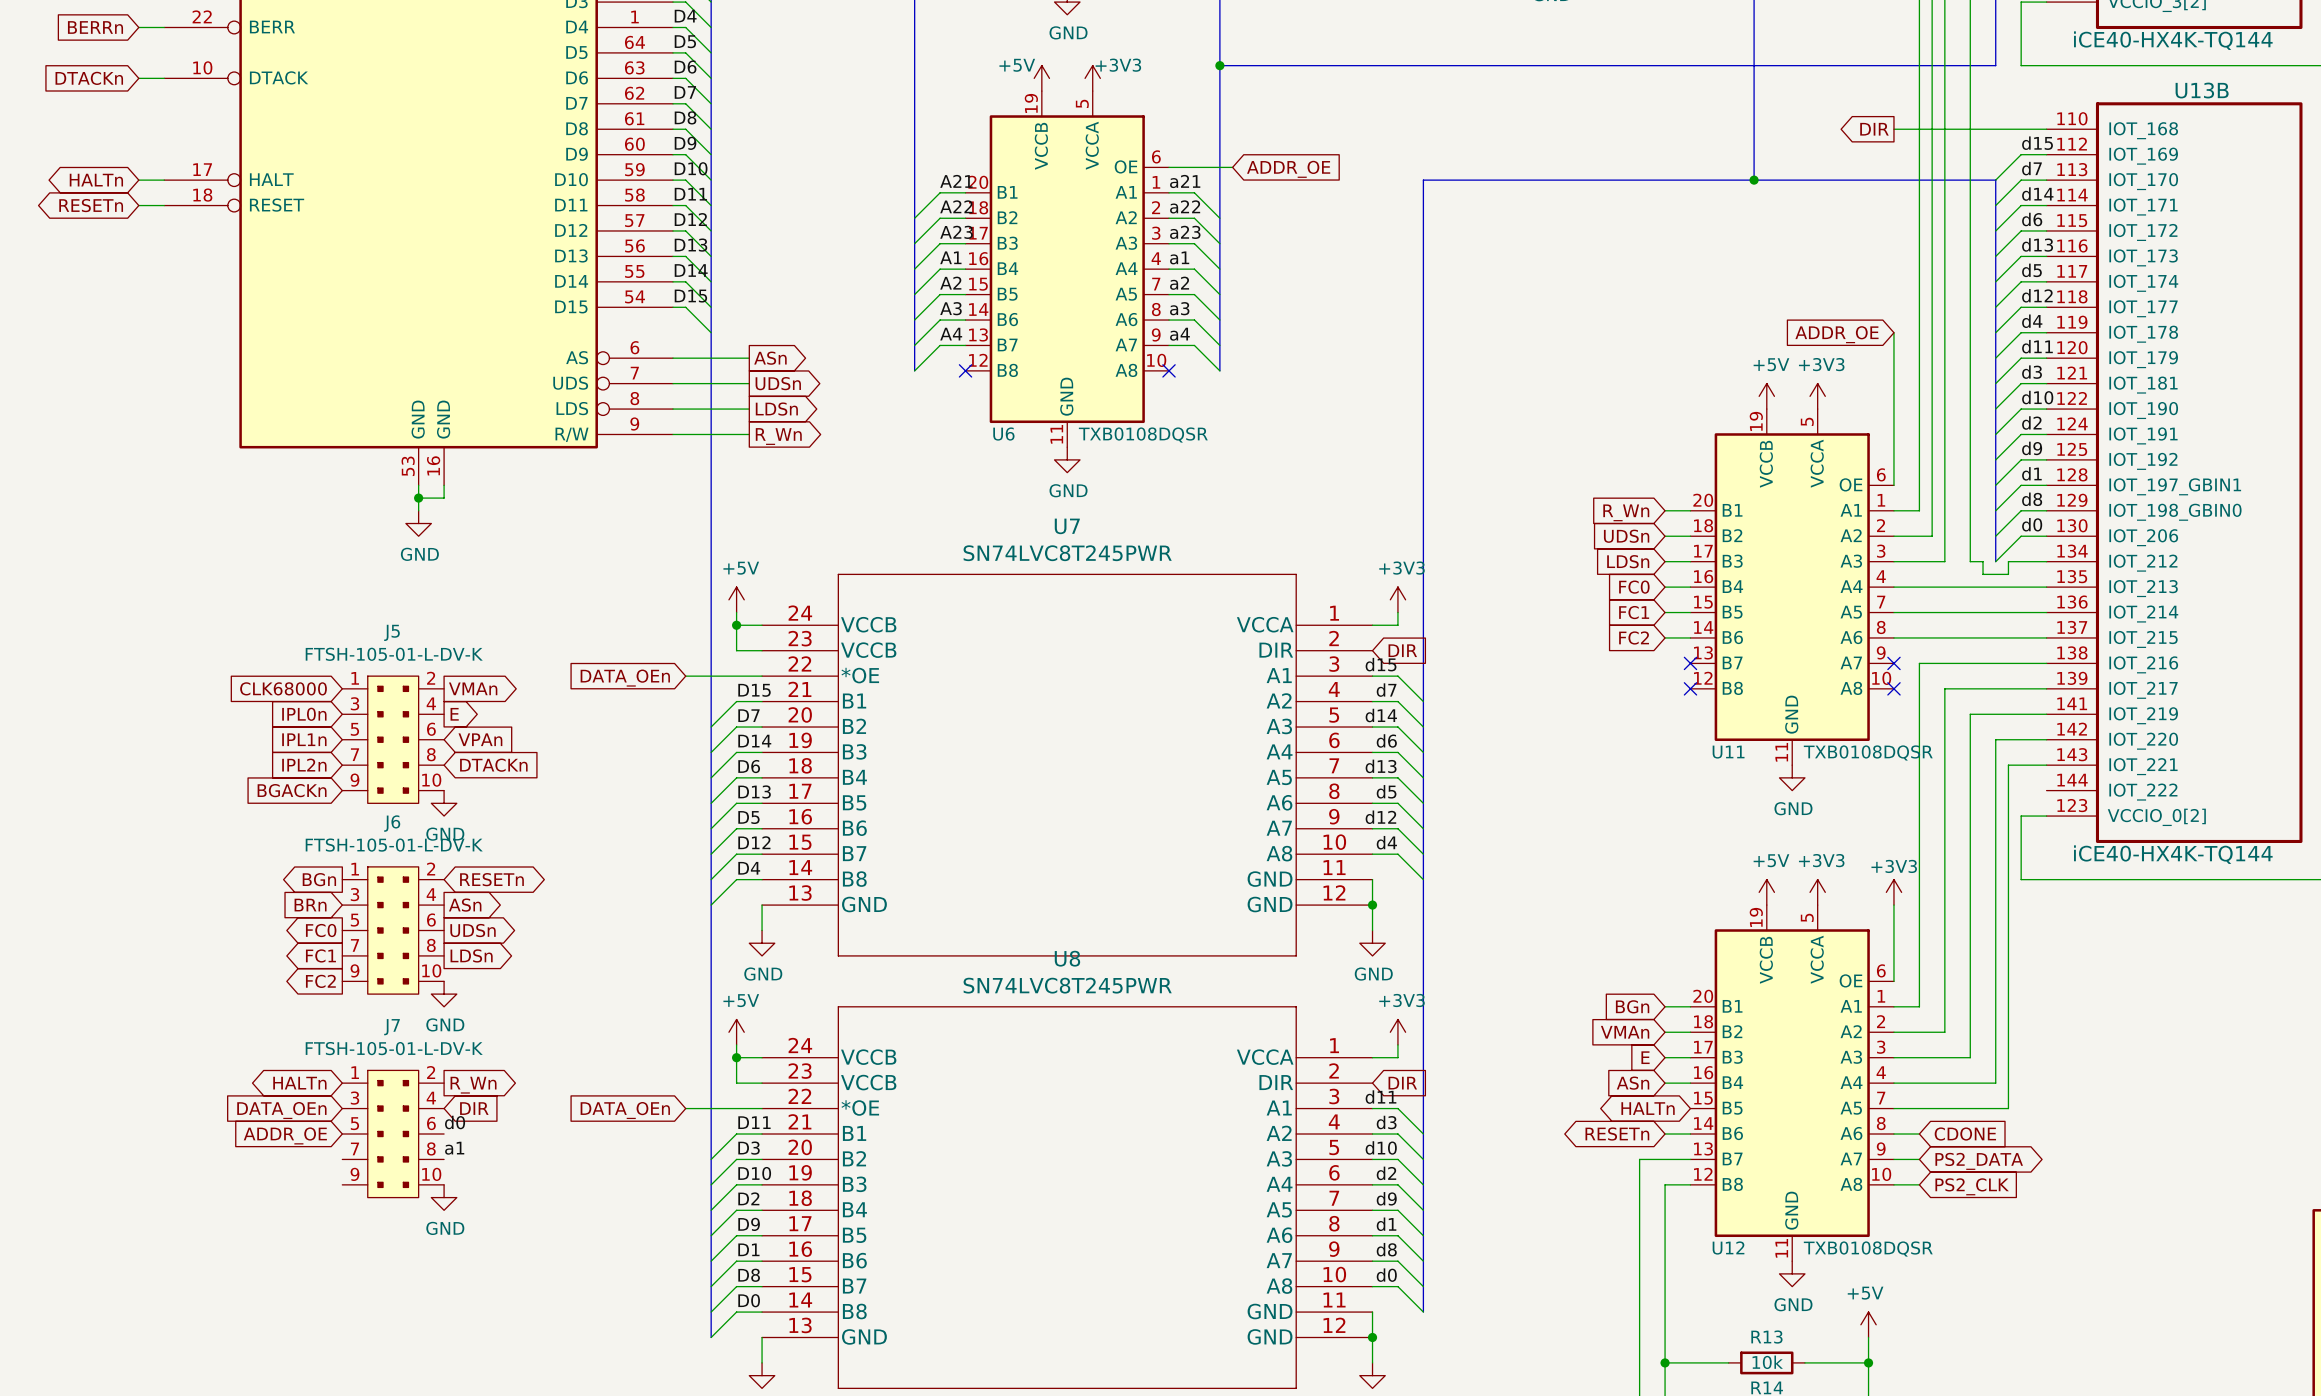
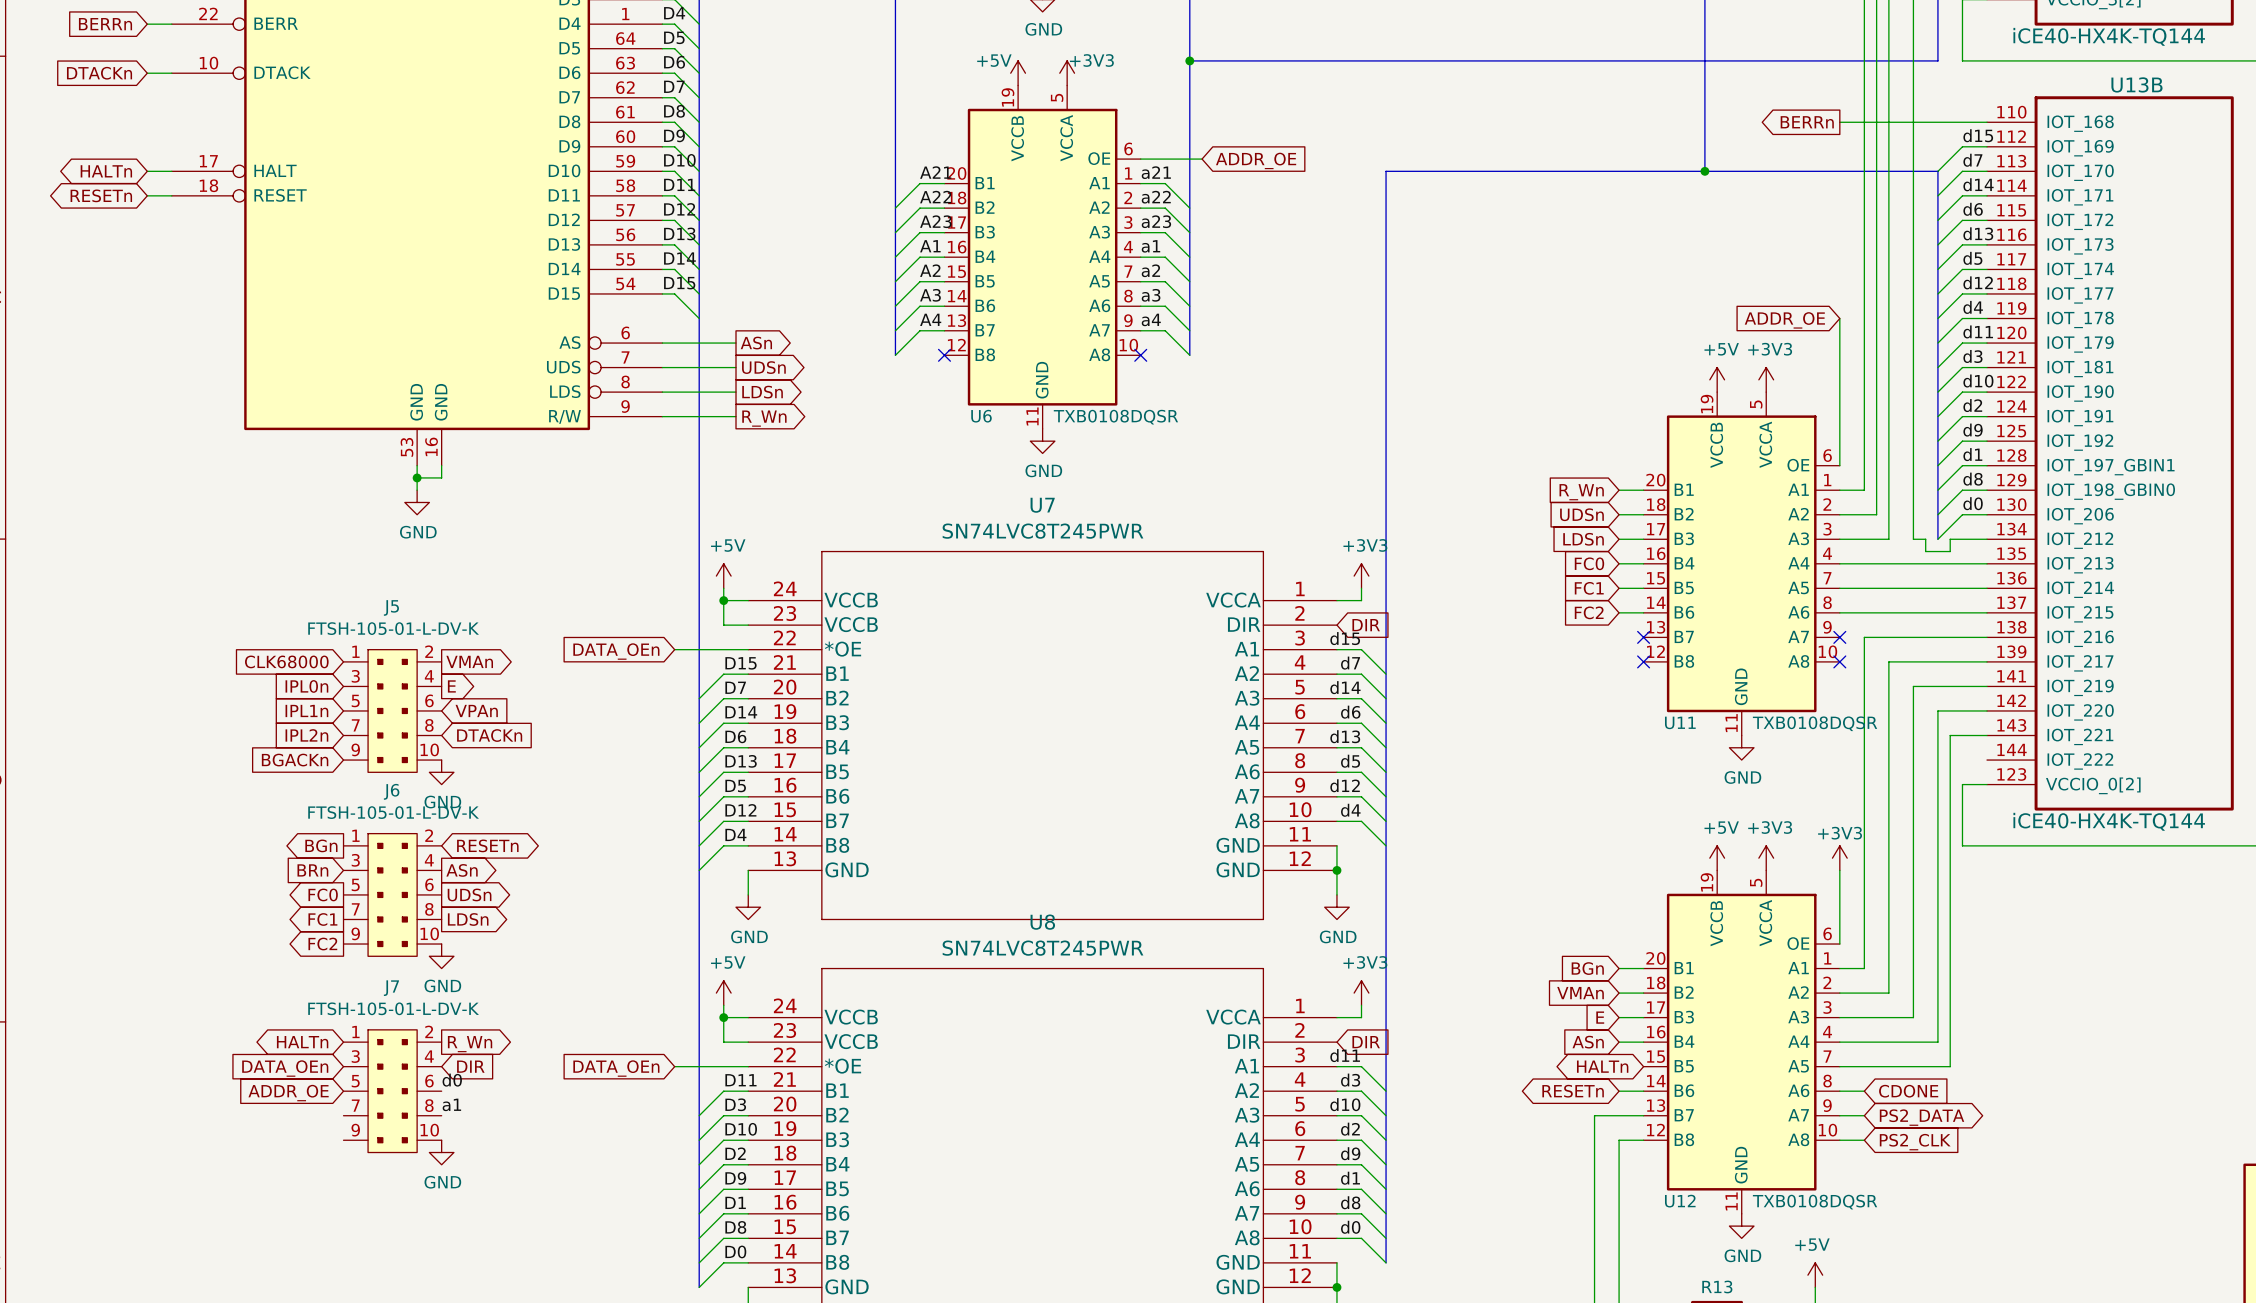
global label: DIR (1874, 129) -> BERRn (1807, 122)

